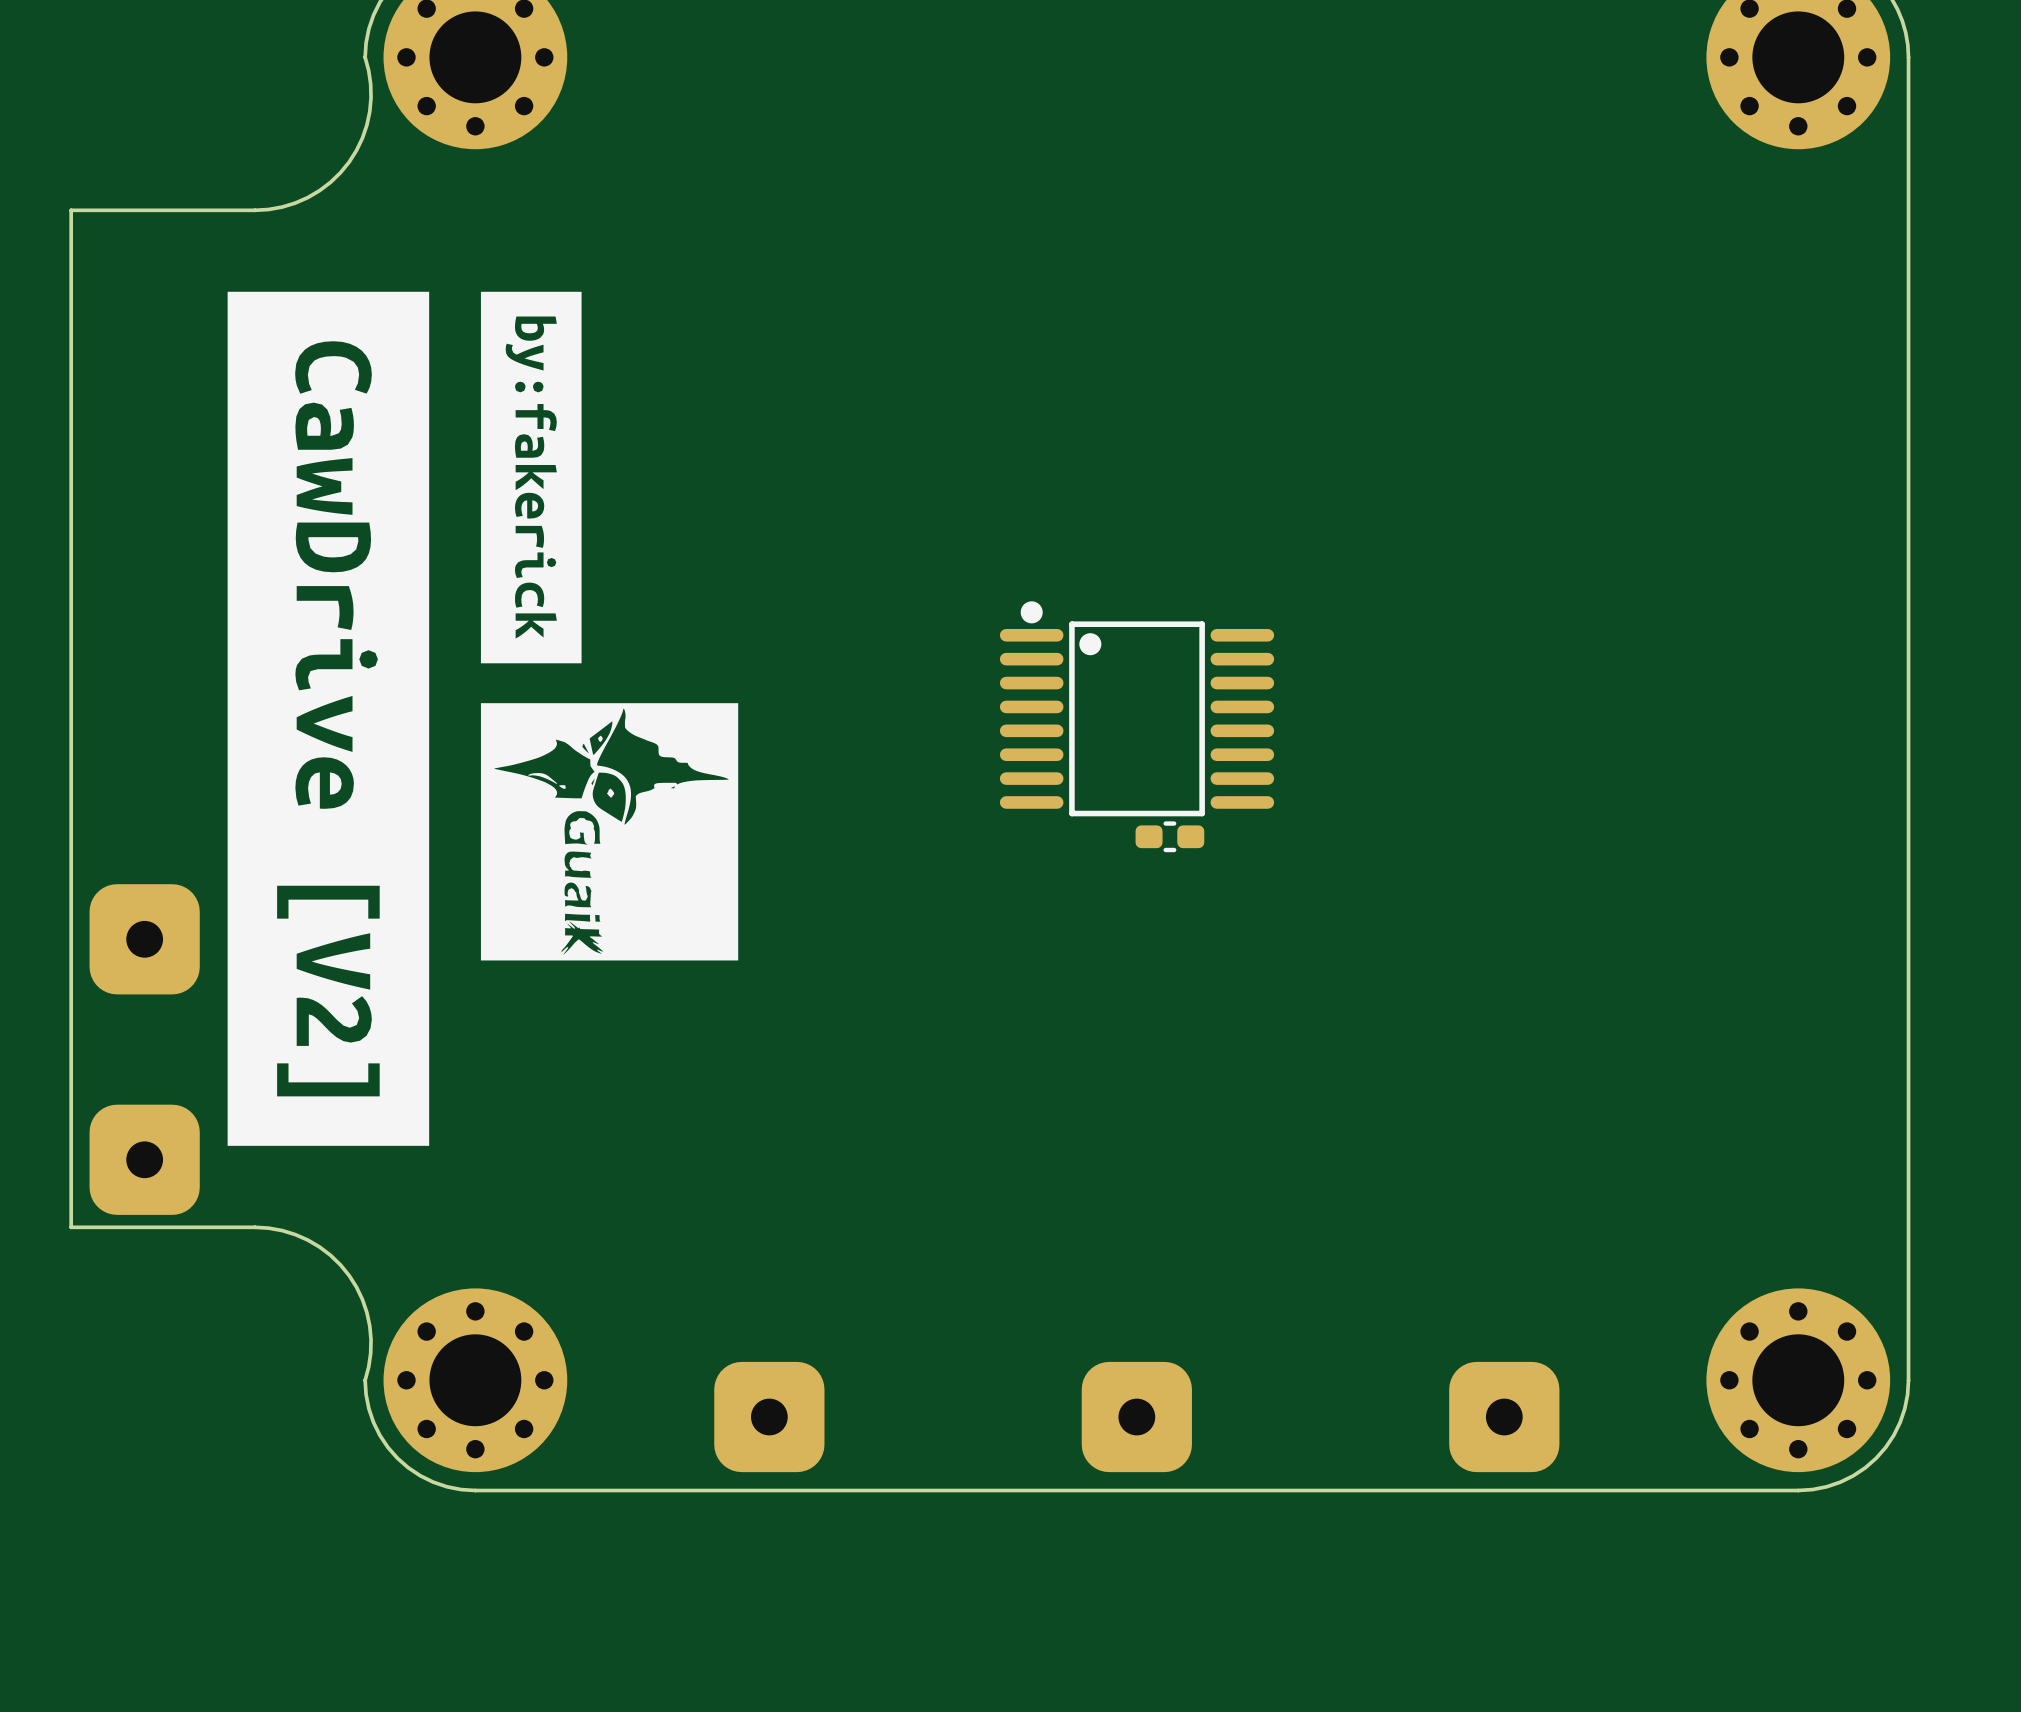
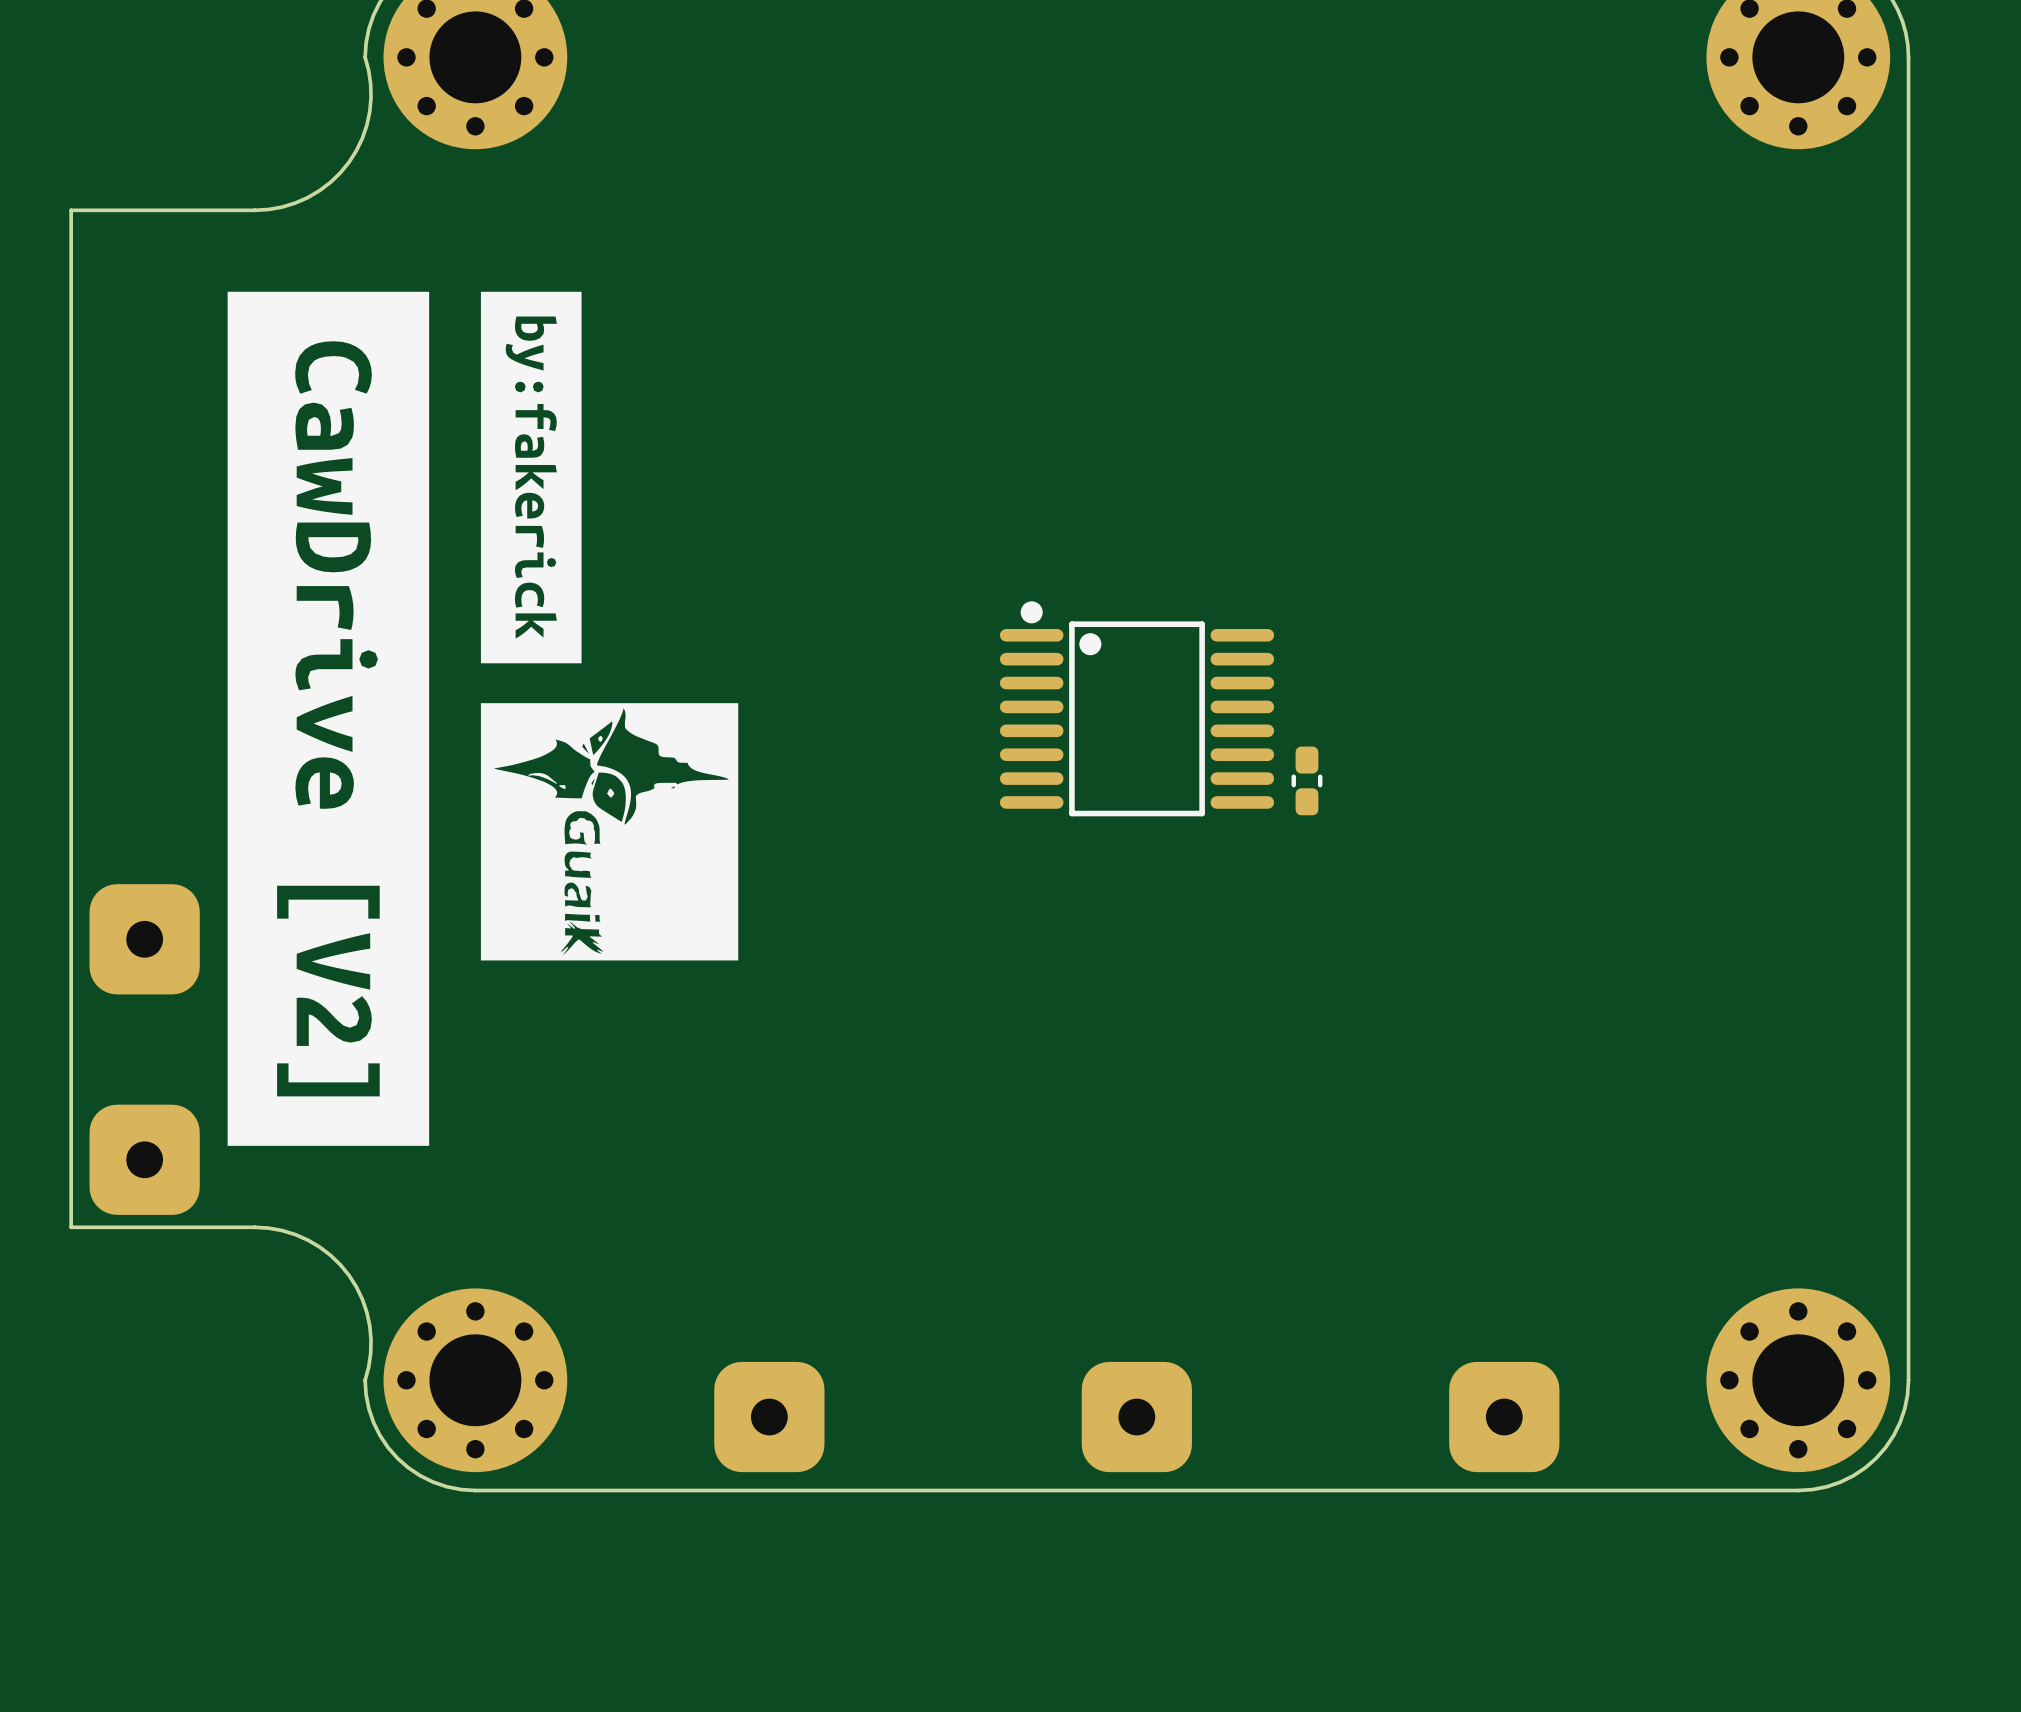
part rotation: 0° (1169, 836) -> 90° clockwise (1306, 780)
part position: (1169, 836) -> (1306, 780)

